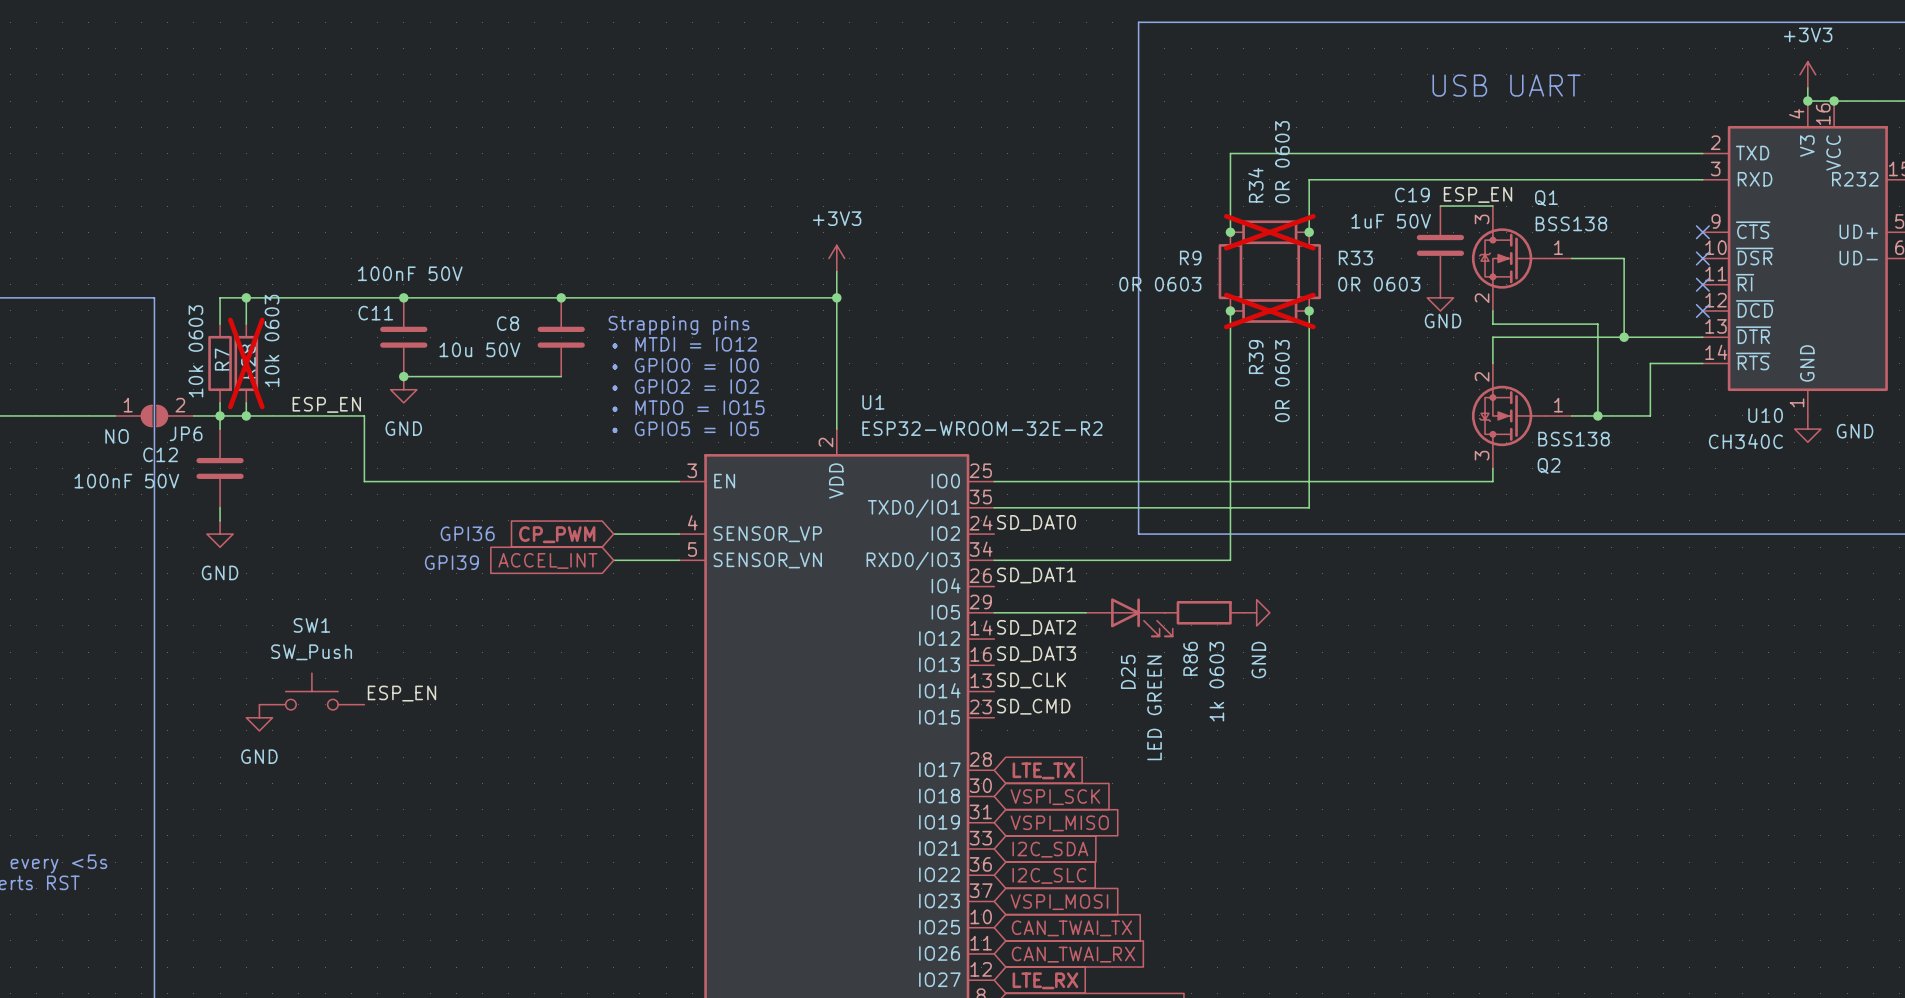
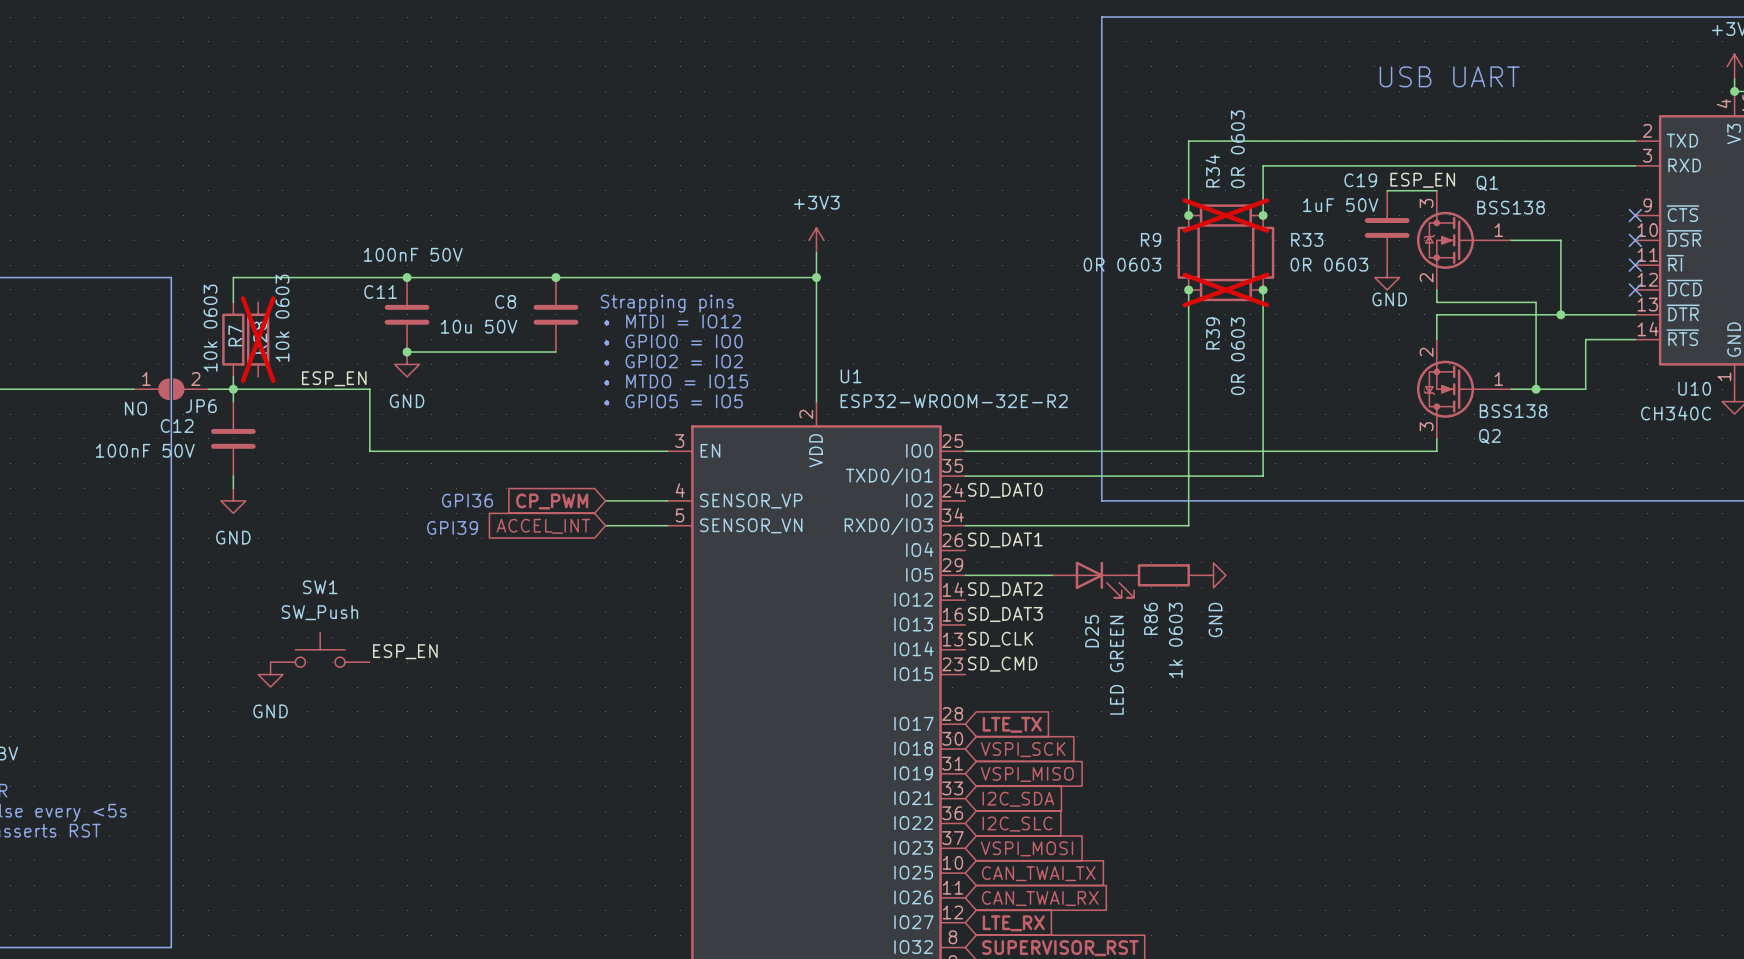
wire: (246, 297) (246, 324) -> none
junction: (246, 297) -> none
wire: (246, 402) (246, 415) -> none
junction: (246, 415) -> none

